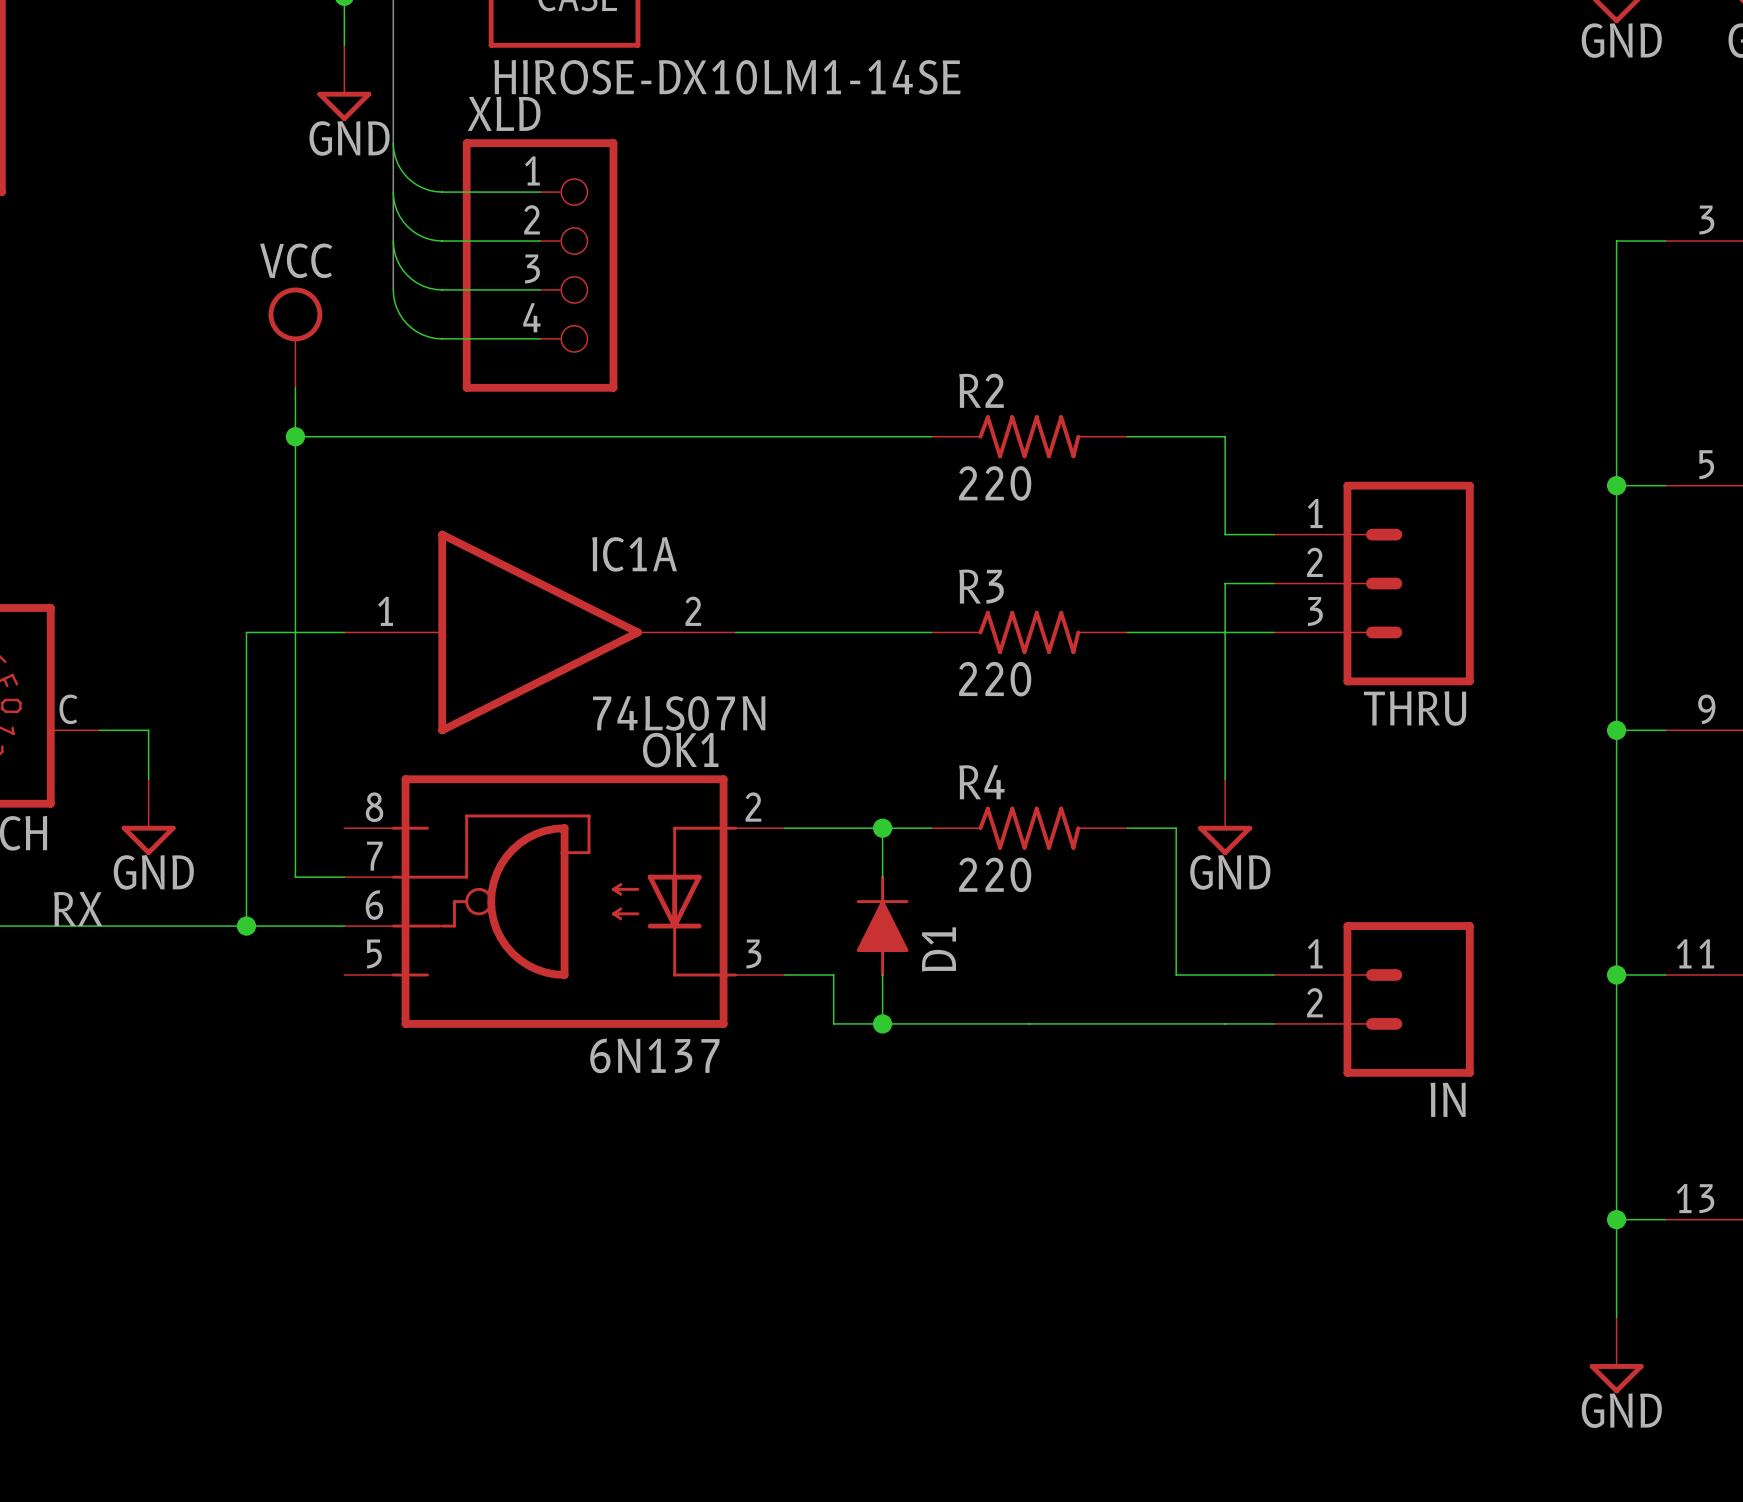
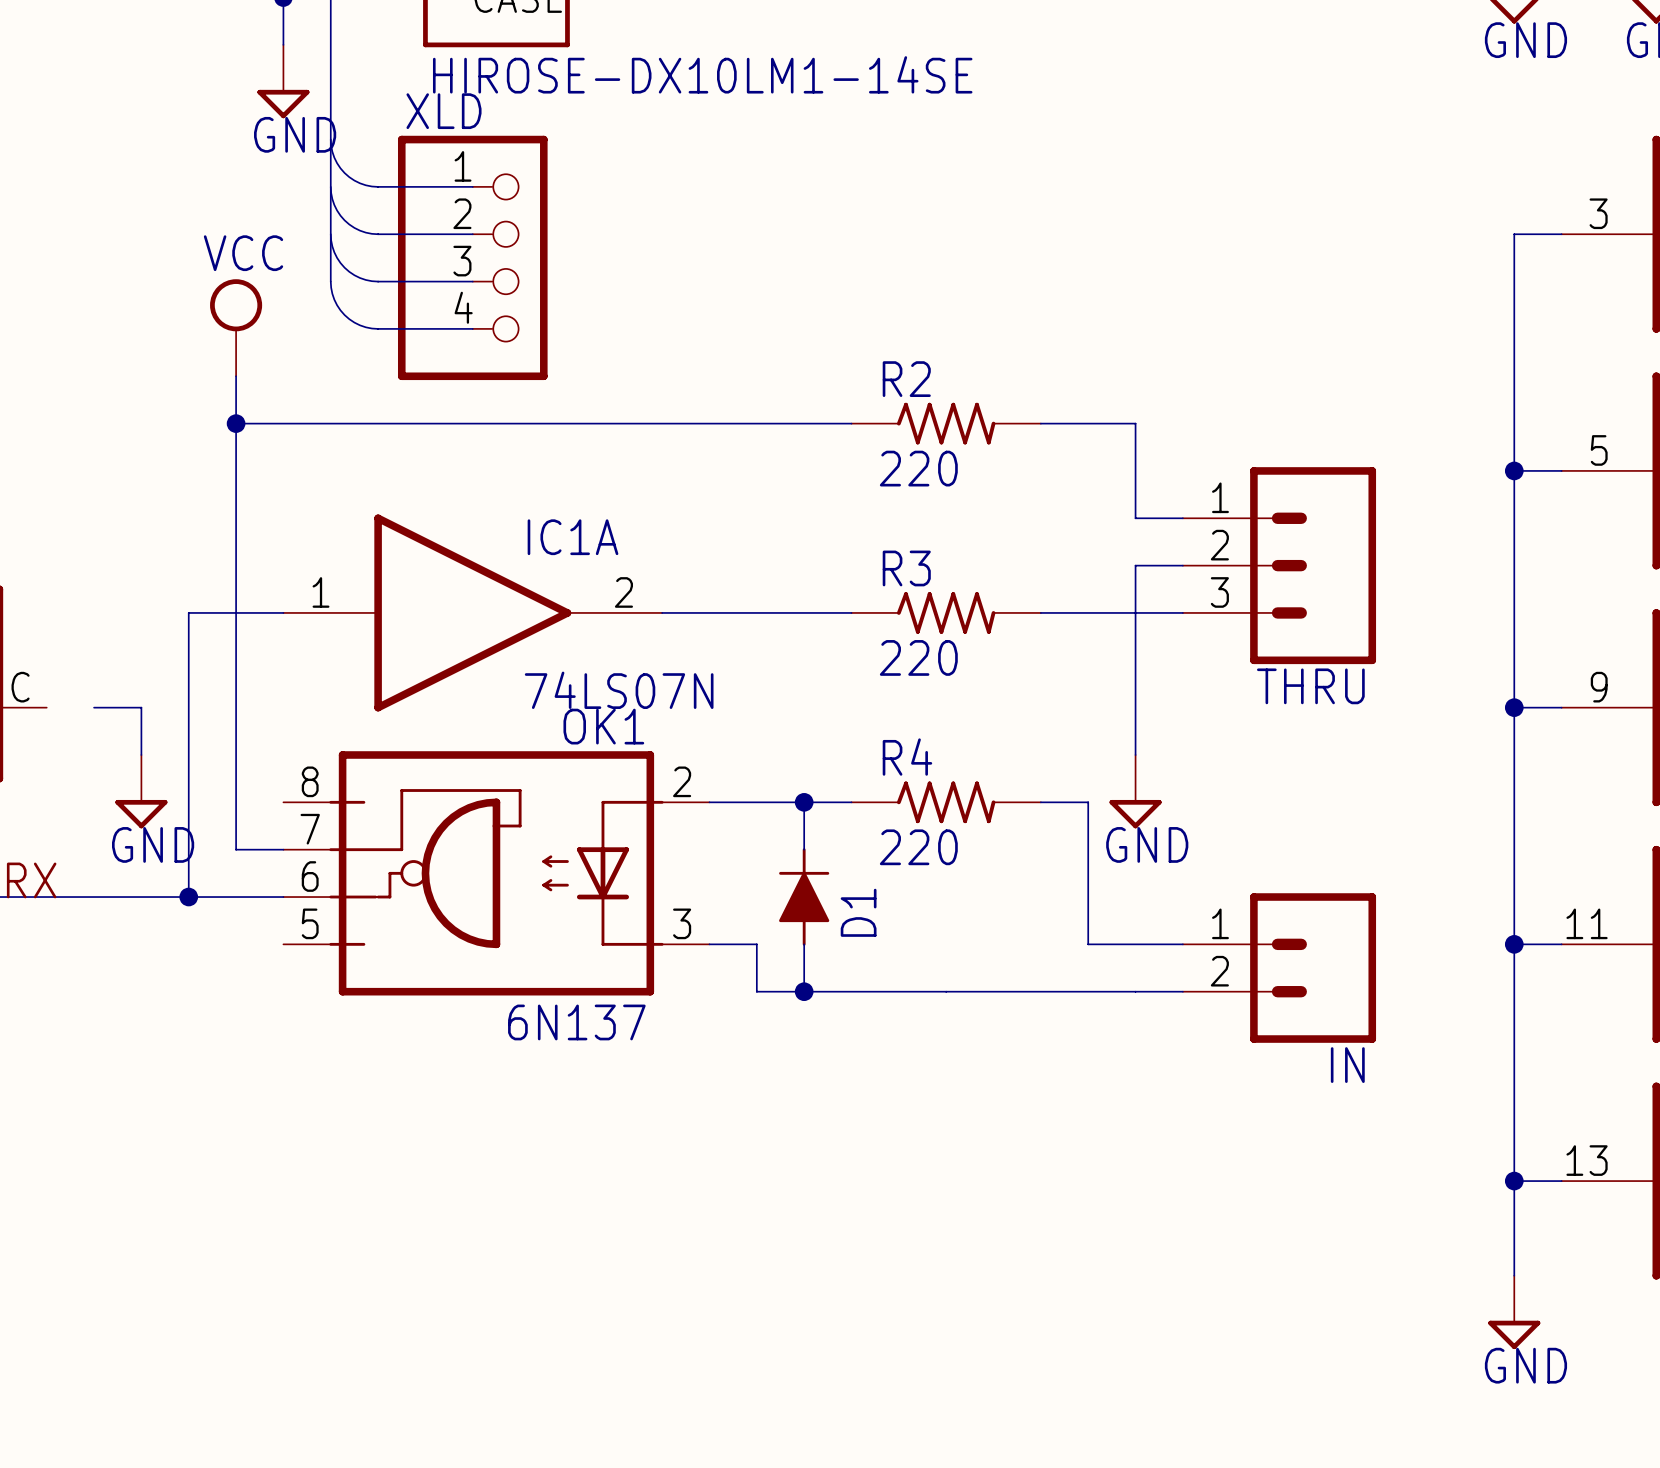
wire: (99, 730) (148, 730) (148, 779) -> (94, 707) (141, 707) (141, 754)
power symbol position: GND (148, 817) -> GND (141, 791)

